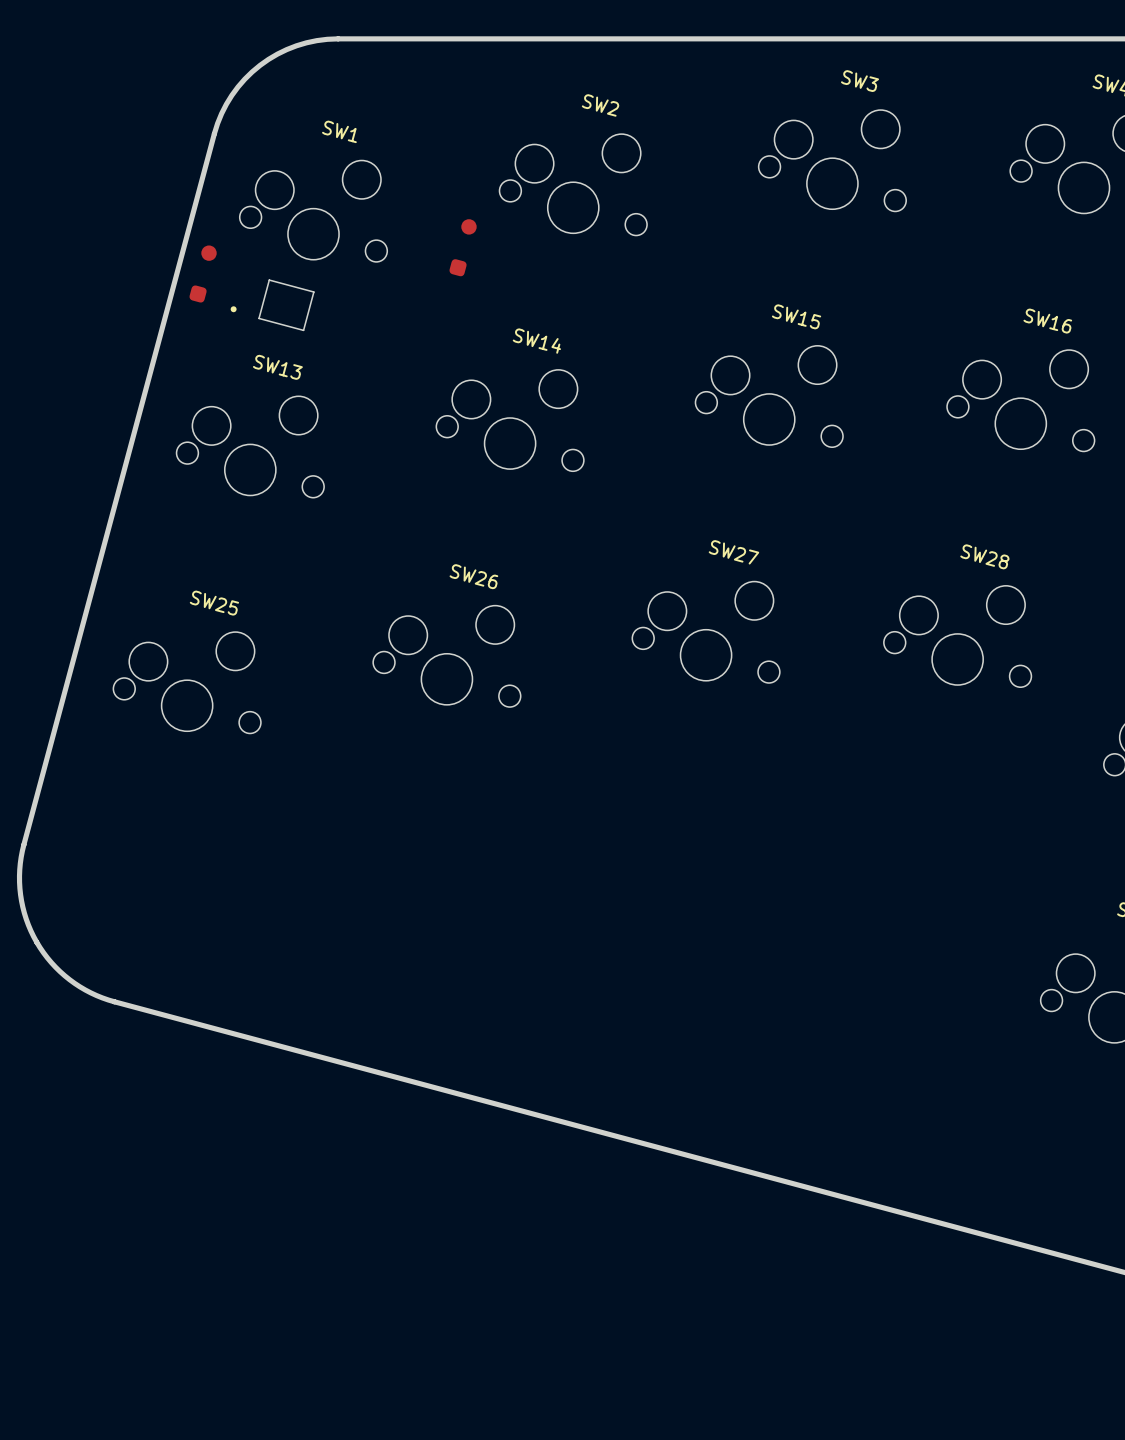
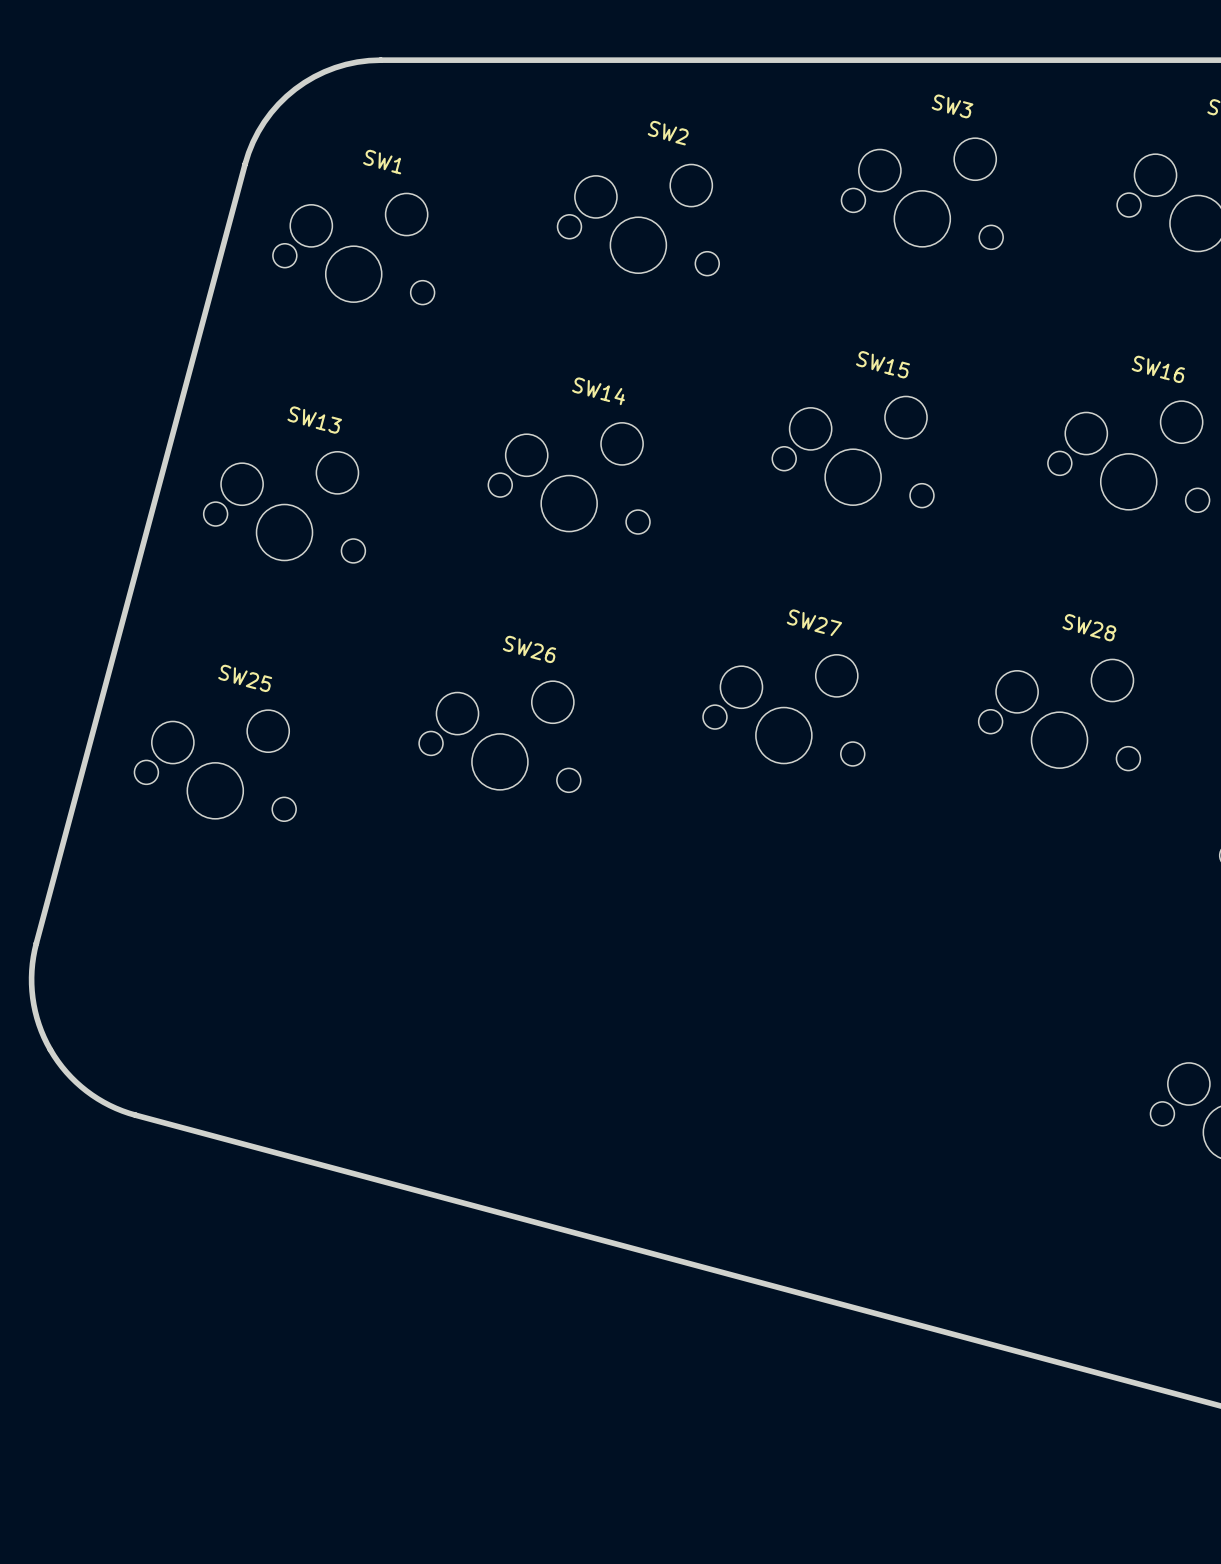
part: (463, 247) -> none
part: (203, 274) -> none
part: (272, 305) -> none

